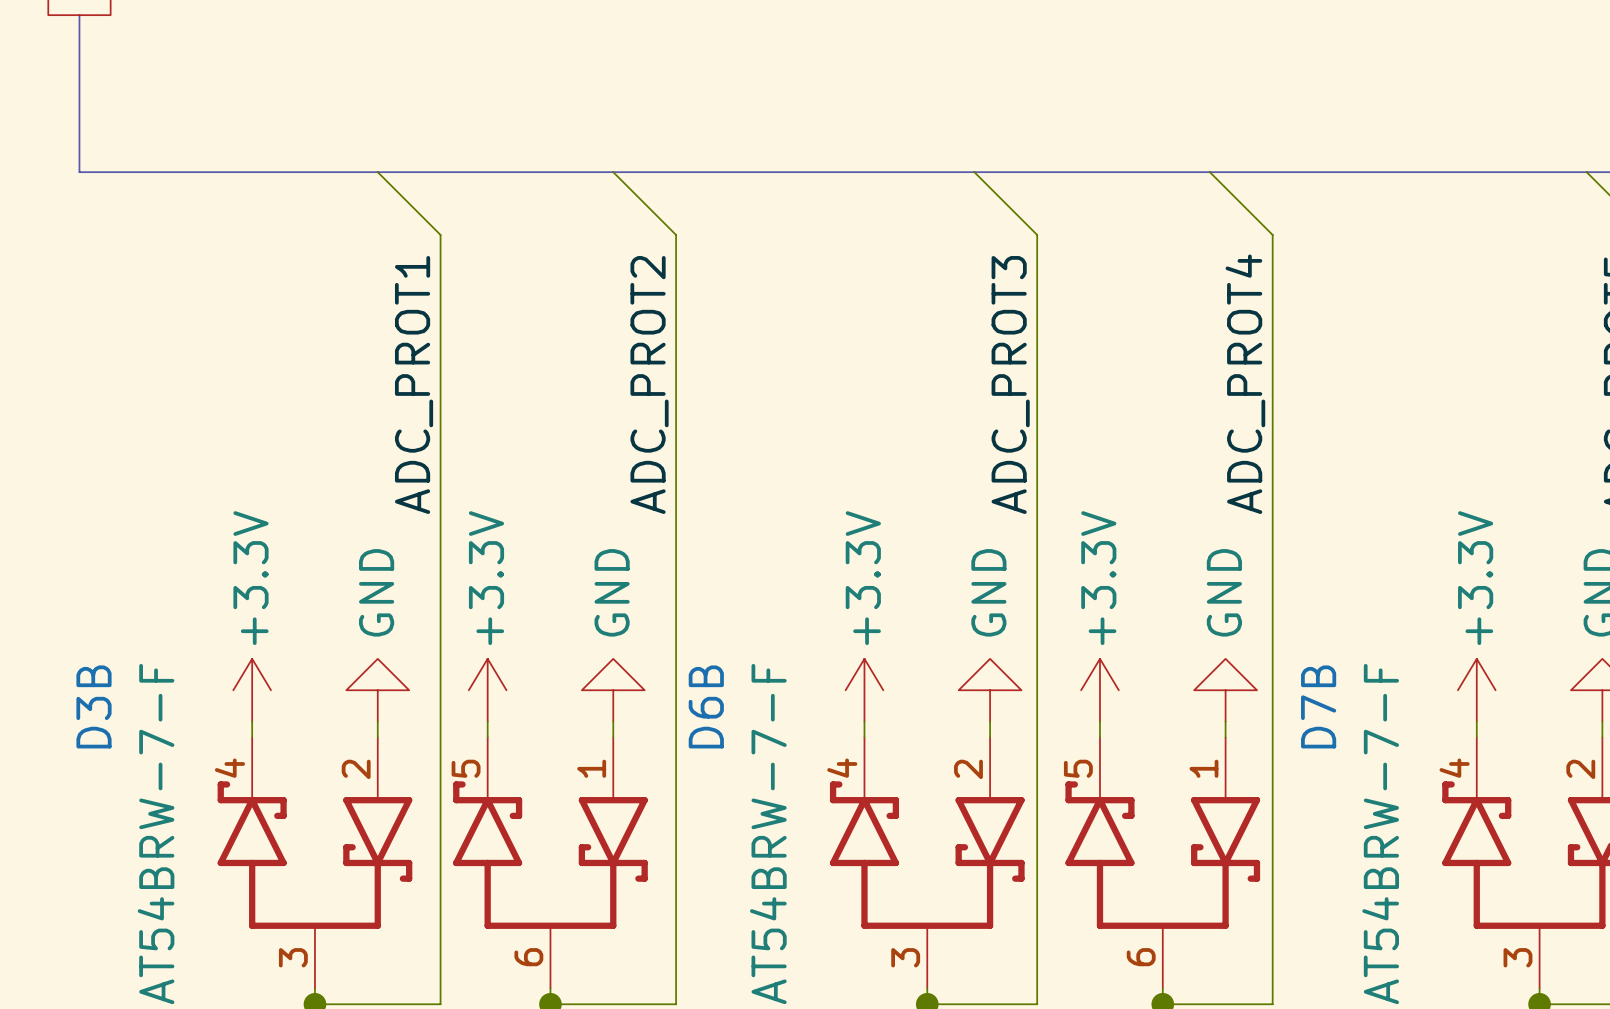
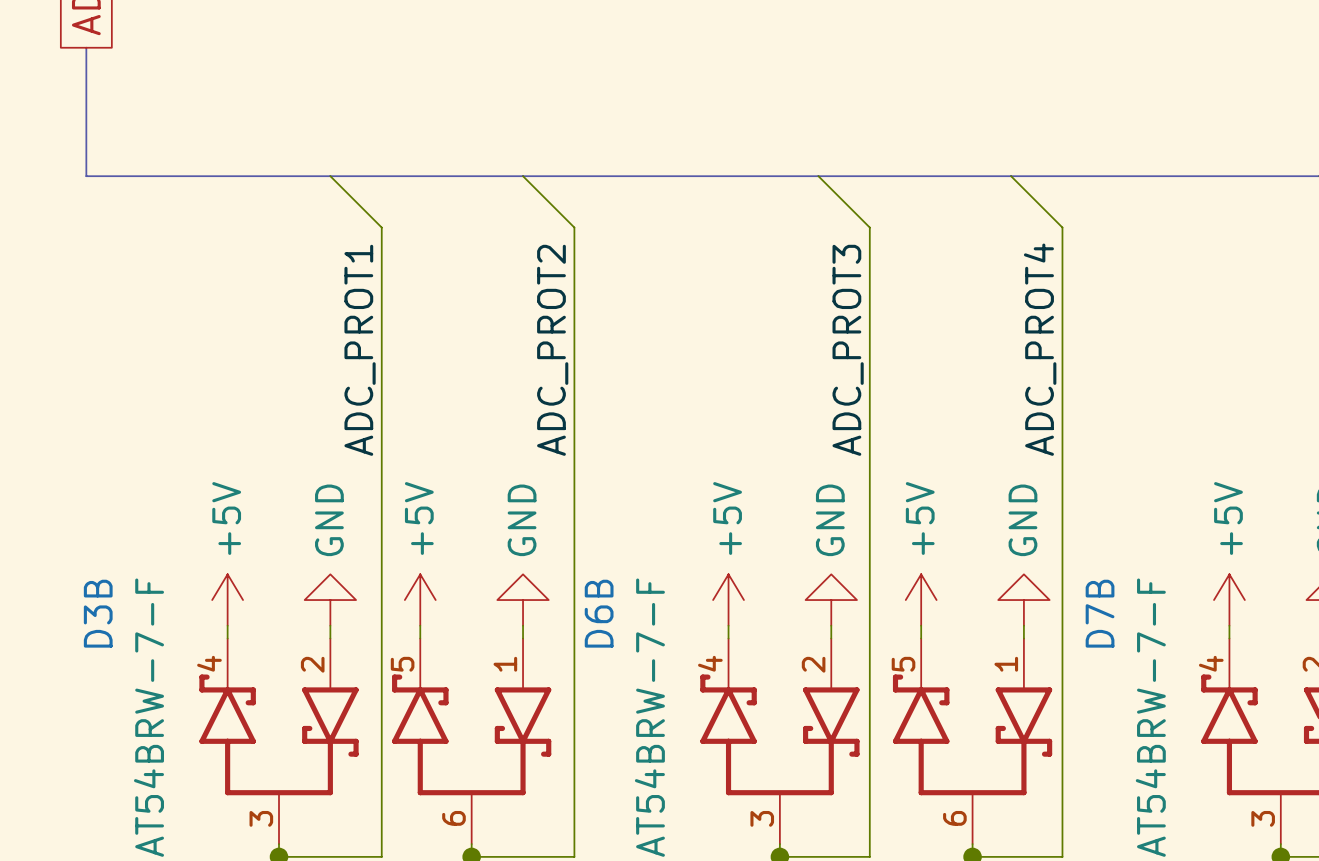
power symbol: +3.3V (252, 690) -> +5V (227, 600)
power symbol: +3.3V (487, 690) -> +5V (420, 600)
power symbol: +3.3V (864, 690) -> +5V (728, 600)
power symbol: +3.3V (1099, 690) -> +5V (921, 600)
power symbol: +3.3V (1476, 690) -> +5V (1229, 600)

